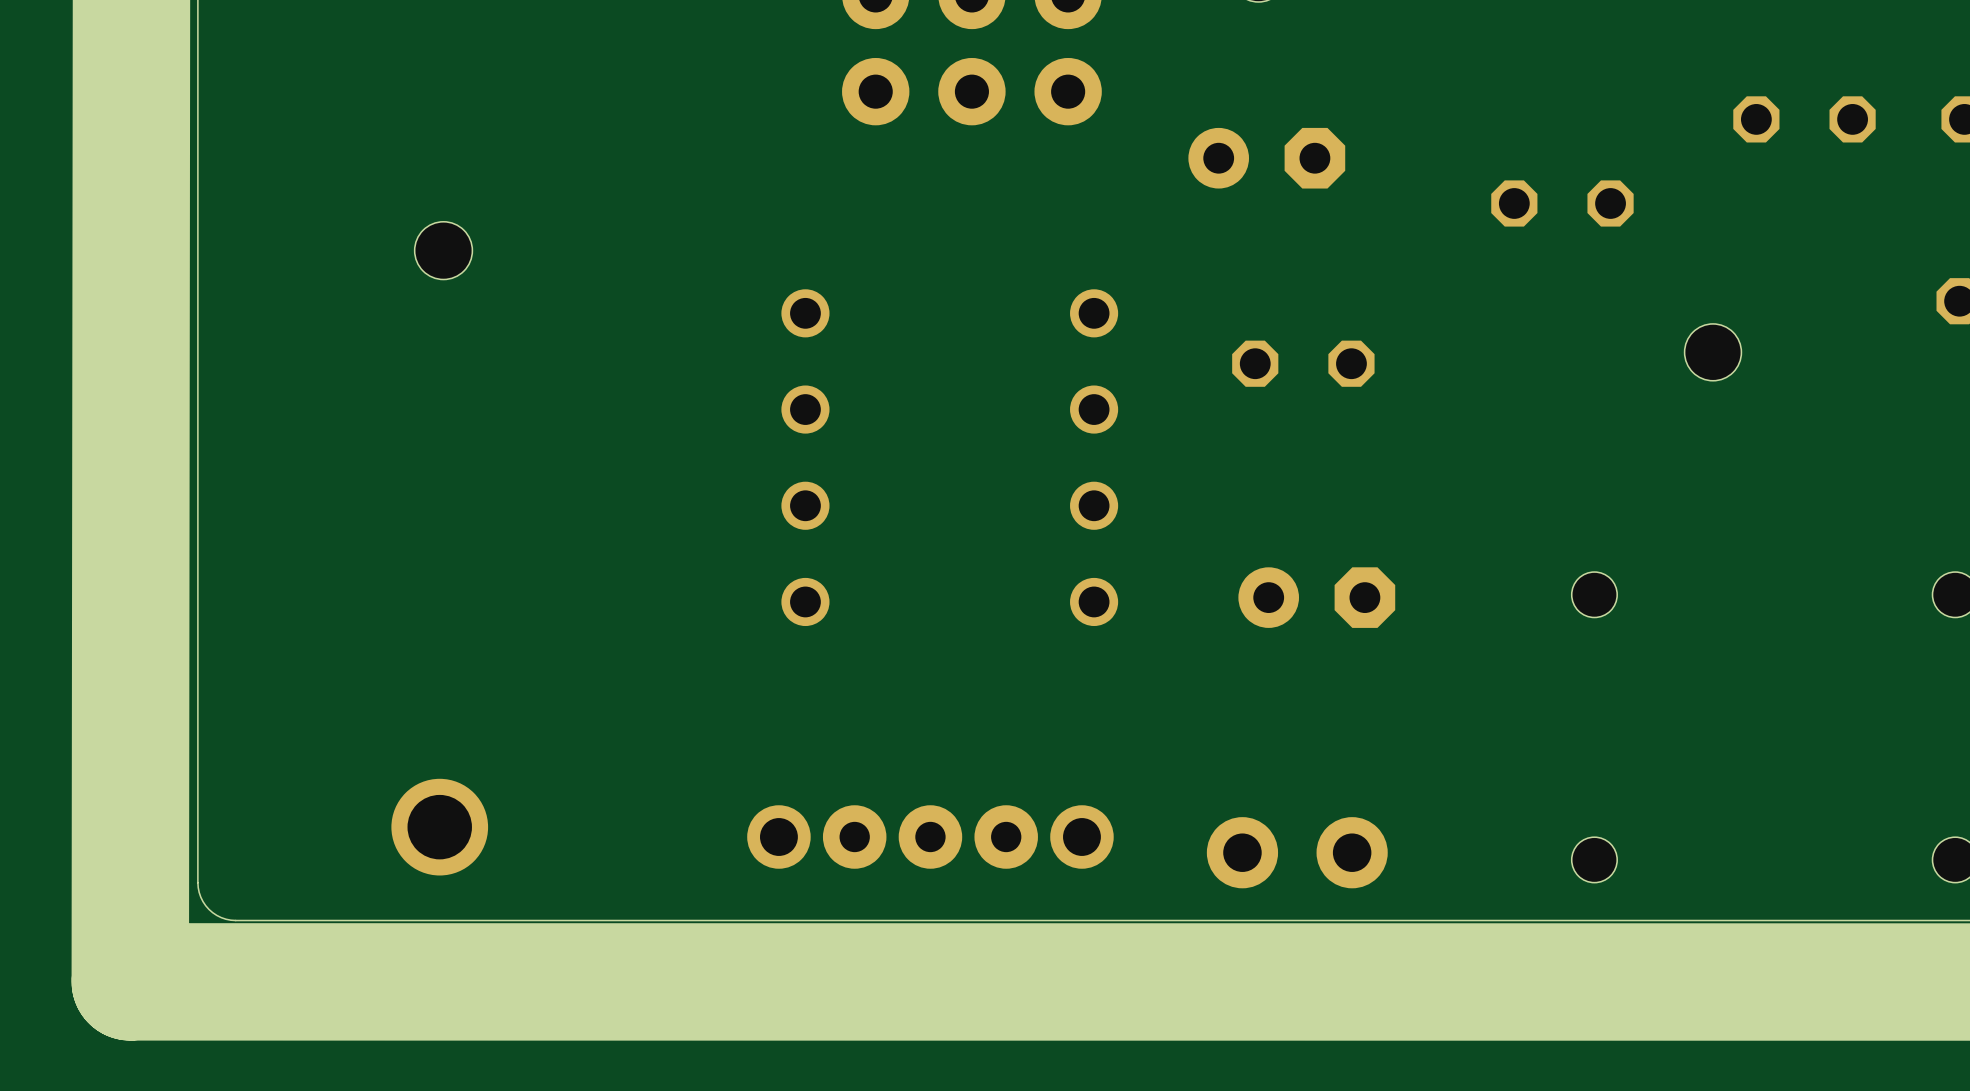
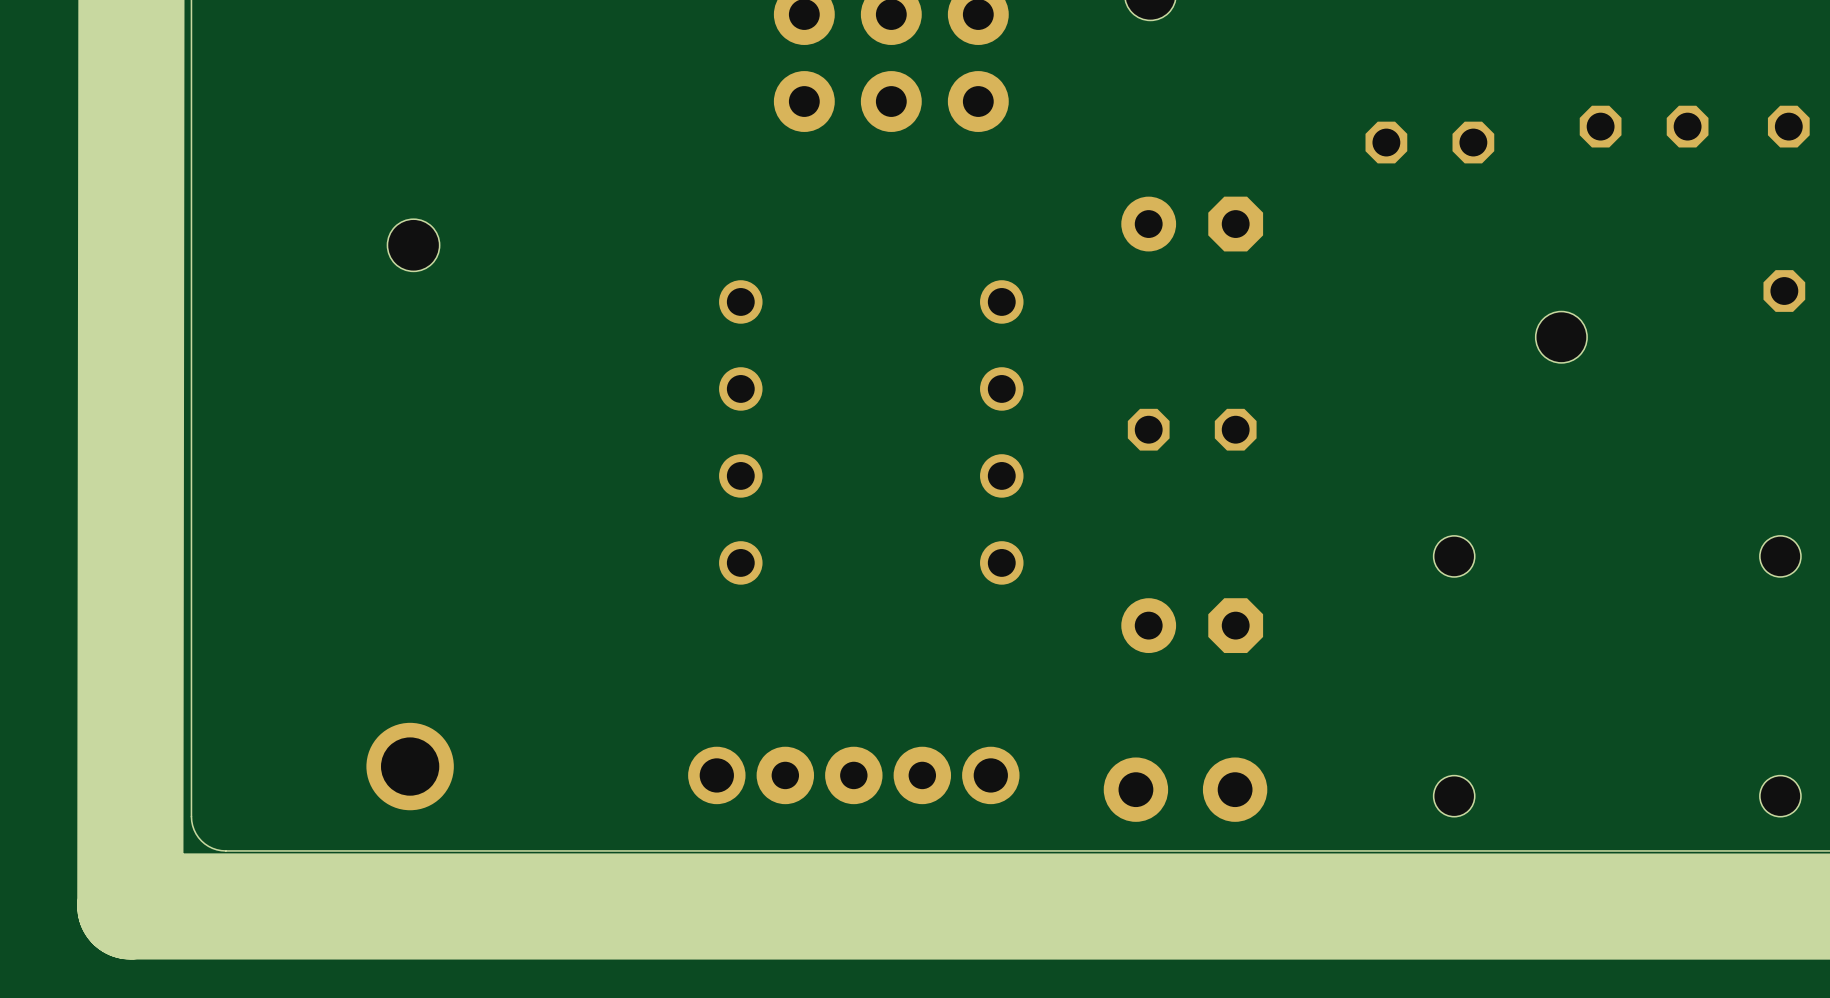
part position: (1266, 158) -> (1192, 224)
part position: (1562, 203) -> (1429, 142)
part position: (1303, 363) -> (1192, 429)
part position: (1316, 597) -> (1192, 625)

